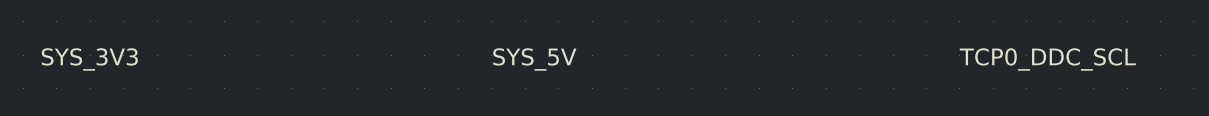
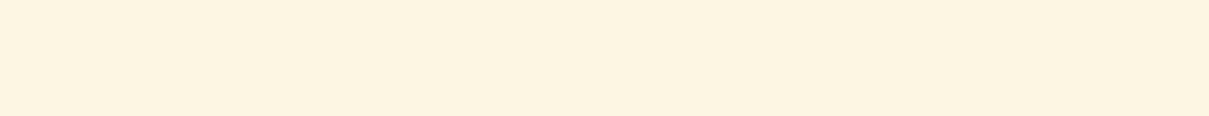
label: SYS_3V3 (89, 59) -> none
label: SYS_5V (534, 59) -> none
label: TCP0_DDC_SCL (1047, 59) -> none

